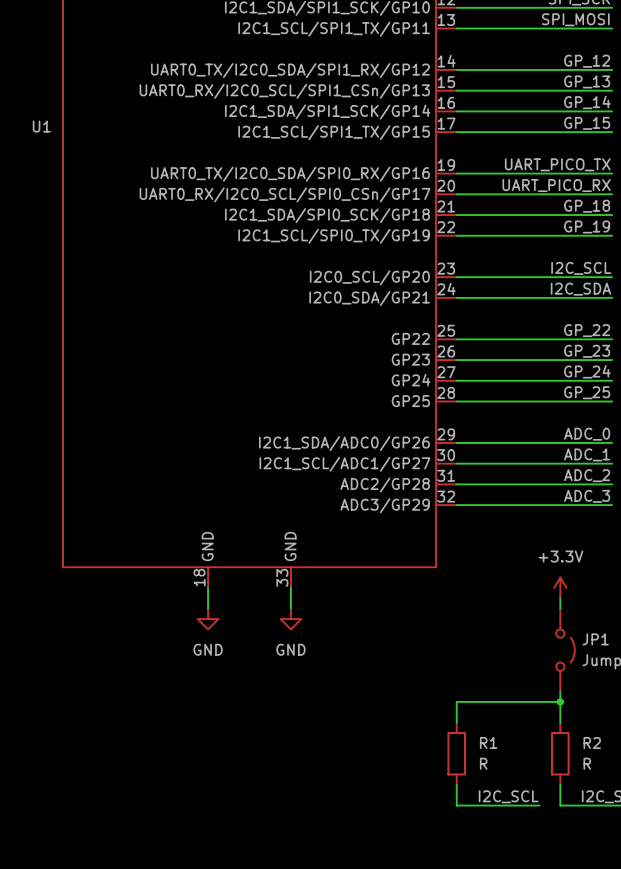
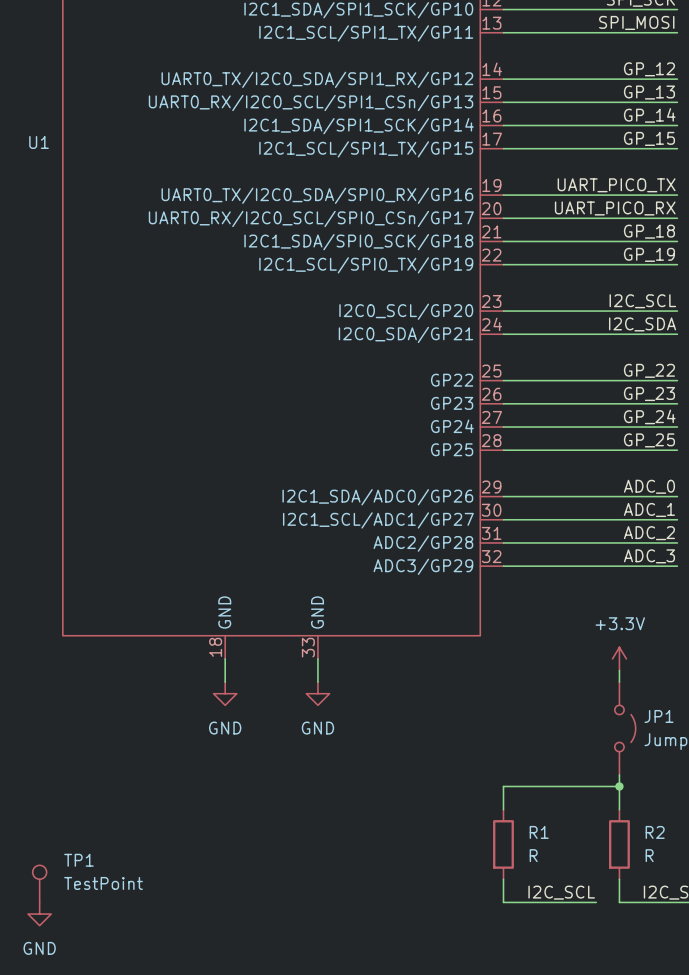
TP1: none -> TestPoint (39, 883)
power symbol: none -> GND (39, 914)

